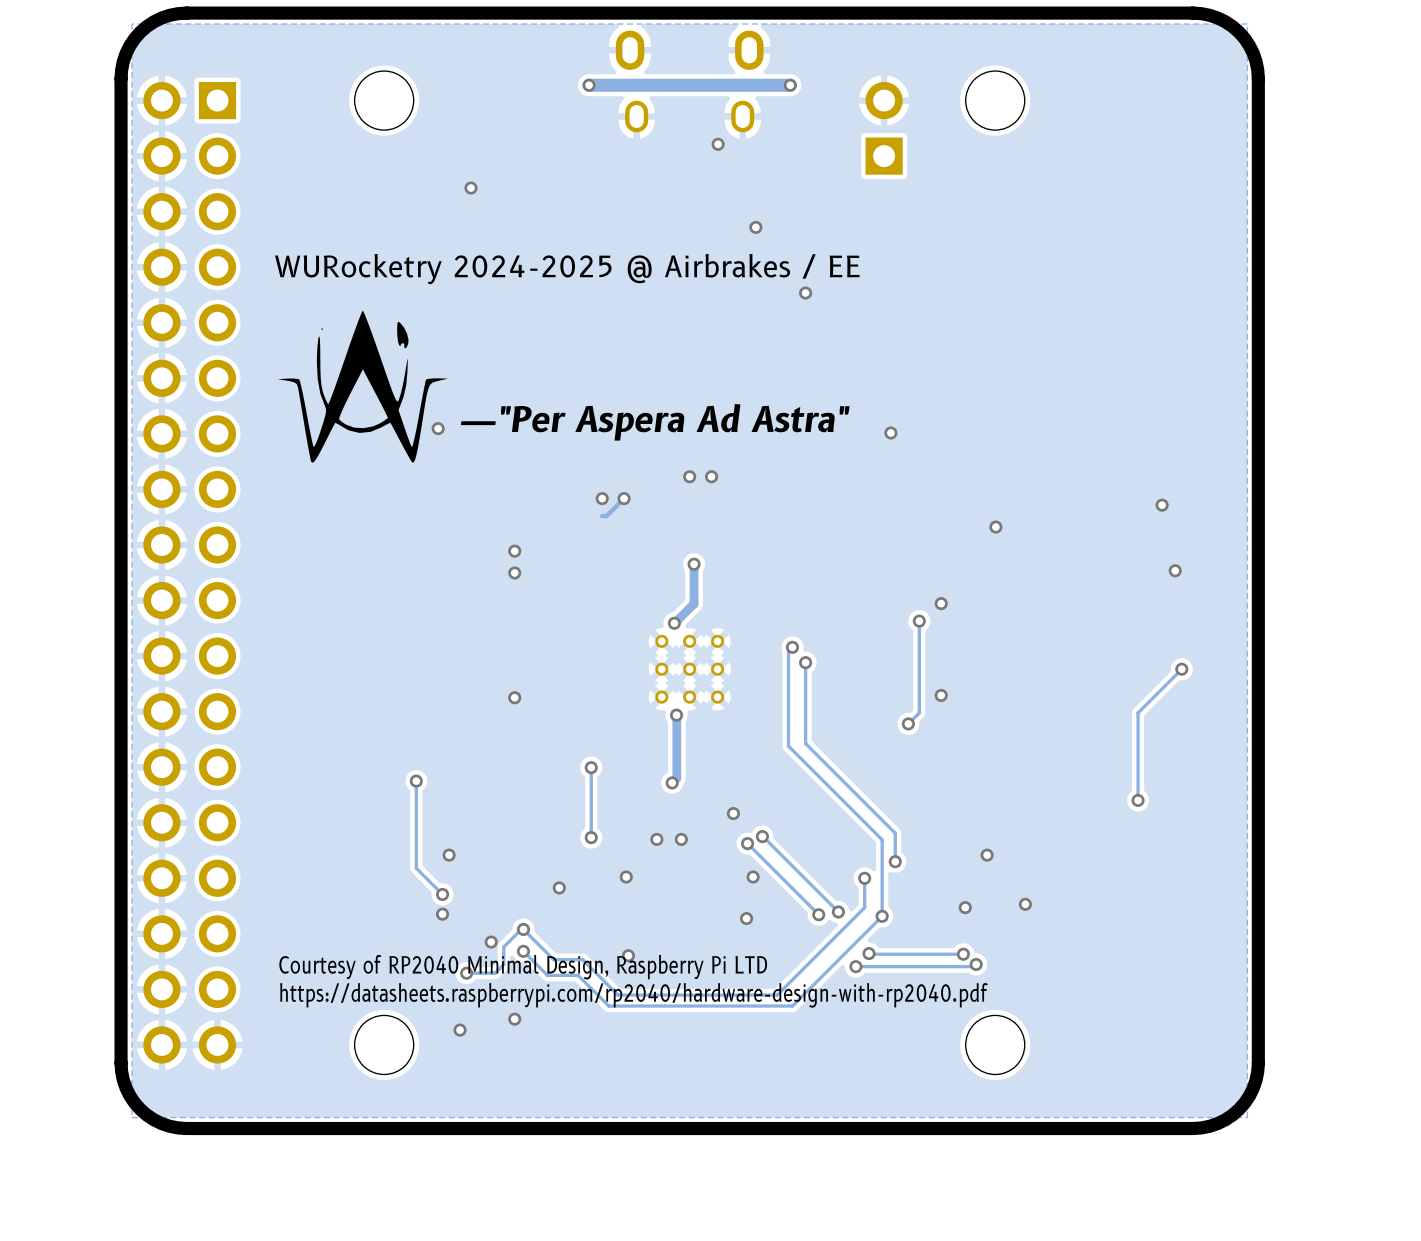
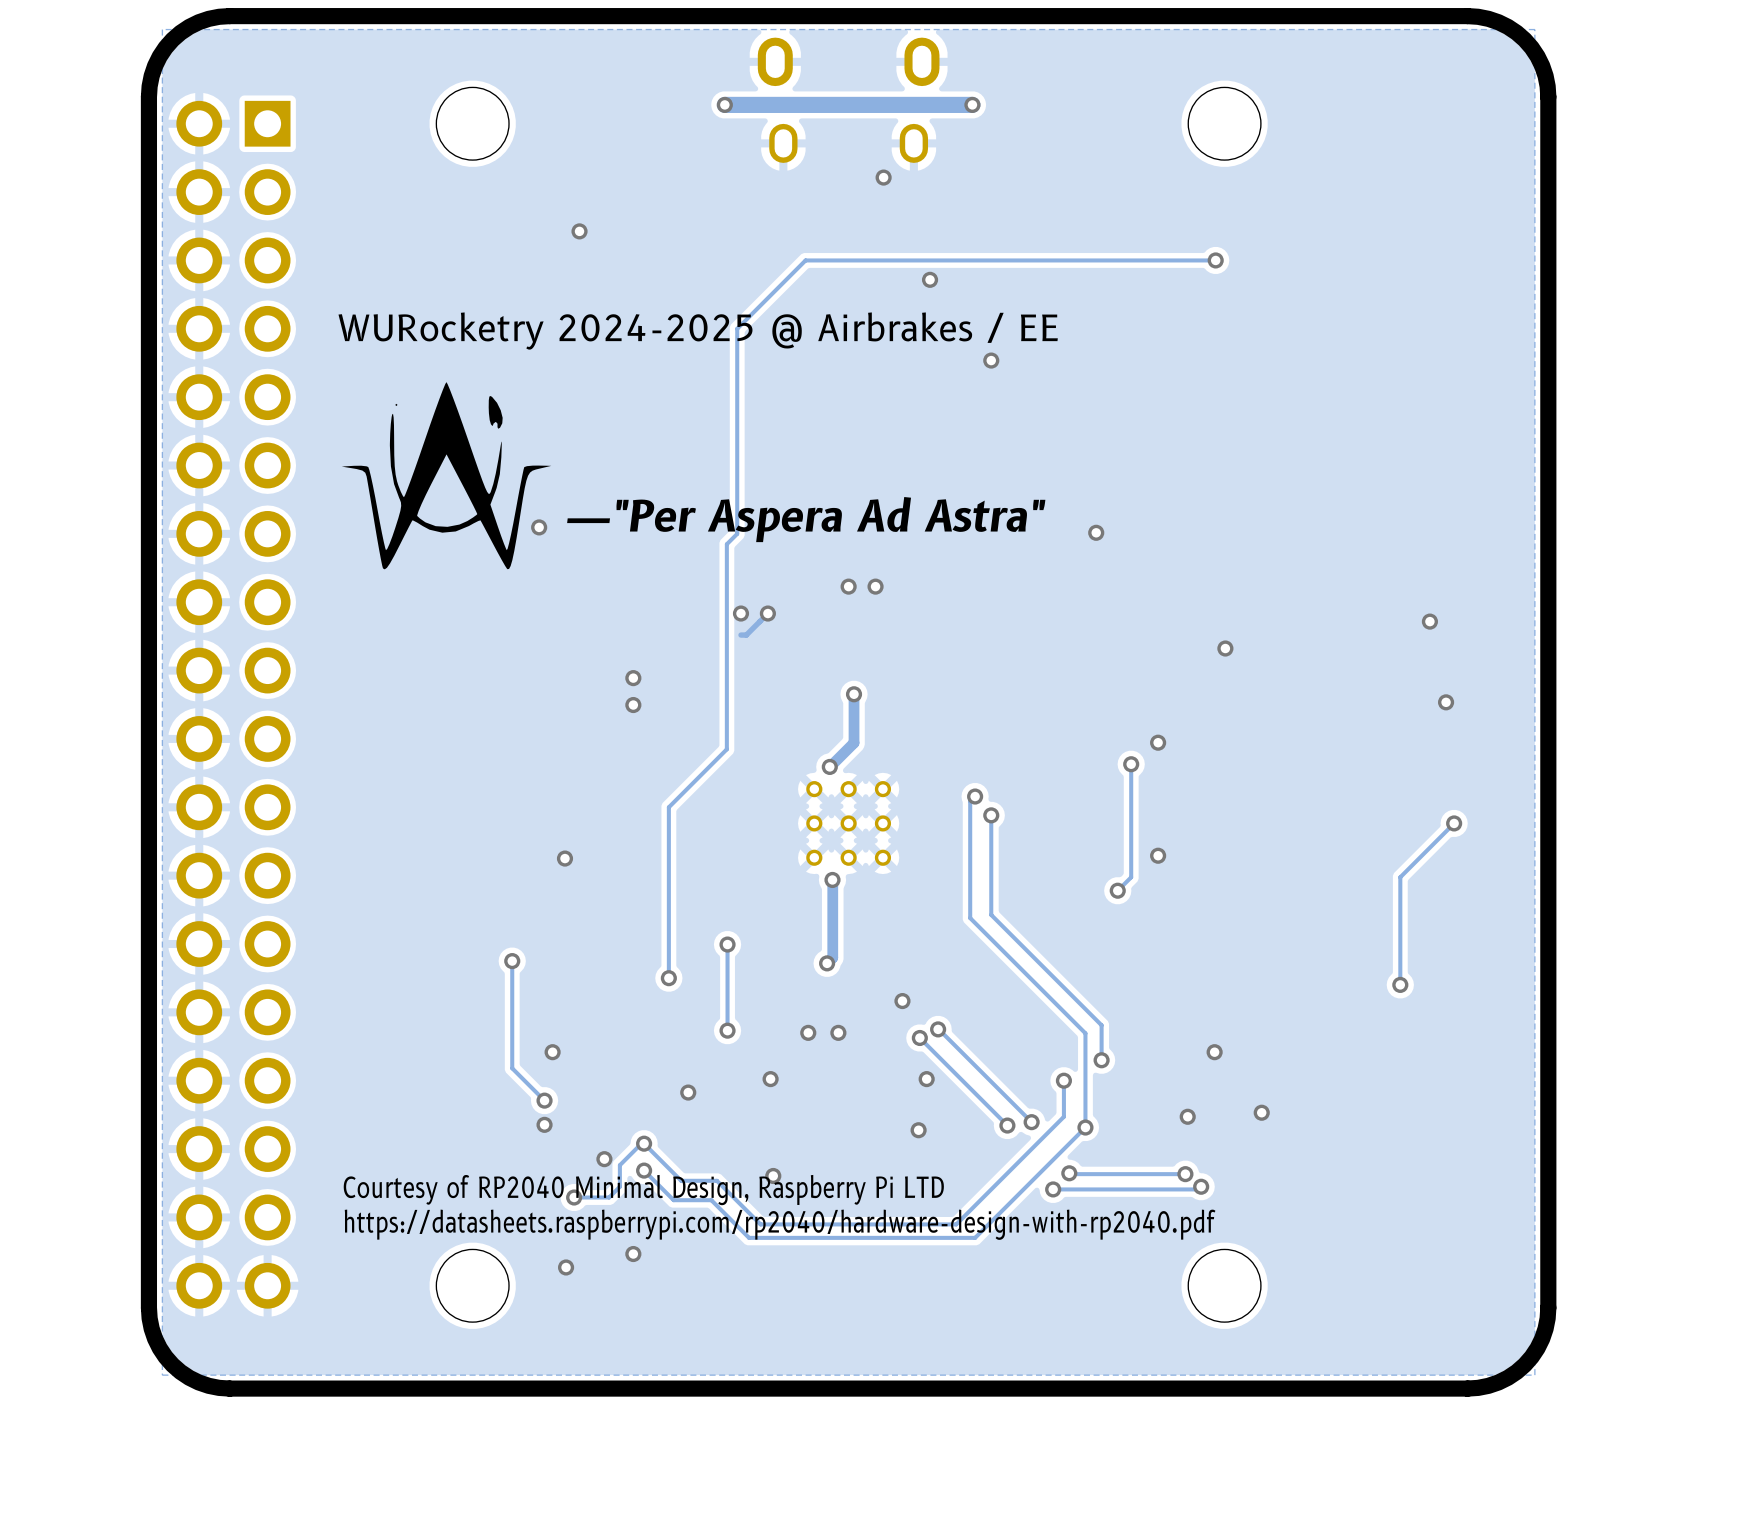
part: (884, 128) -> none
track: none -> (1215, 260) (805, 260) (737, 328) (737, 533) (726, 544) (726, 749) (668, 807) (668, 978)
via: none -> (1215, 260)
via: none -> (564, 858)
via: (514, 697) -> none
via: none -> (668, 978)

